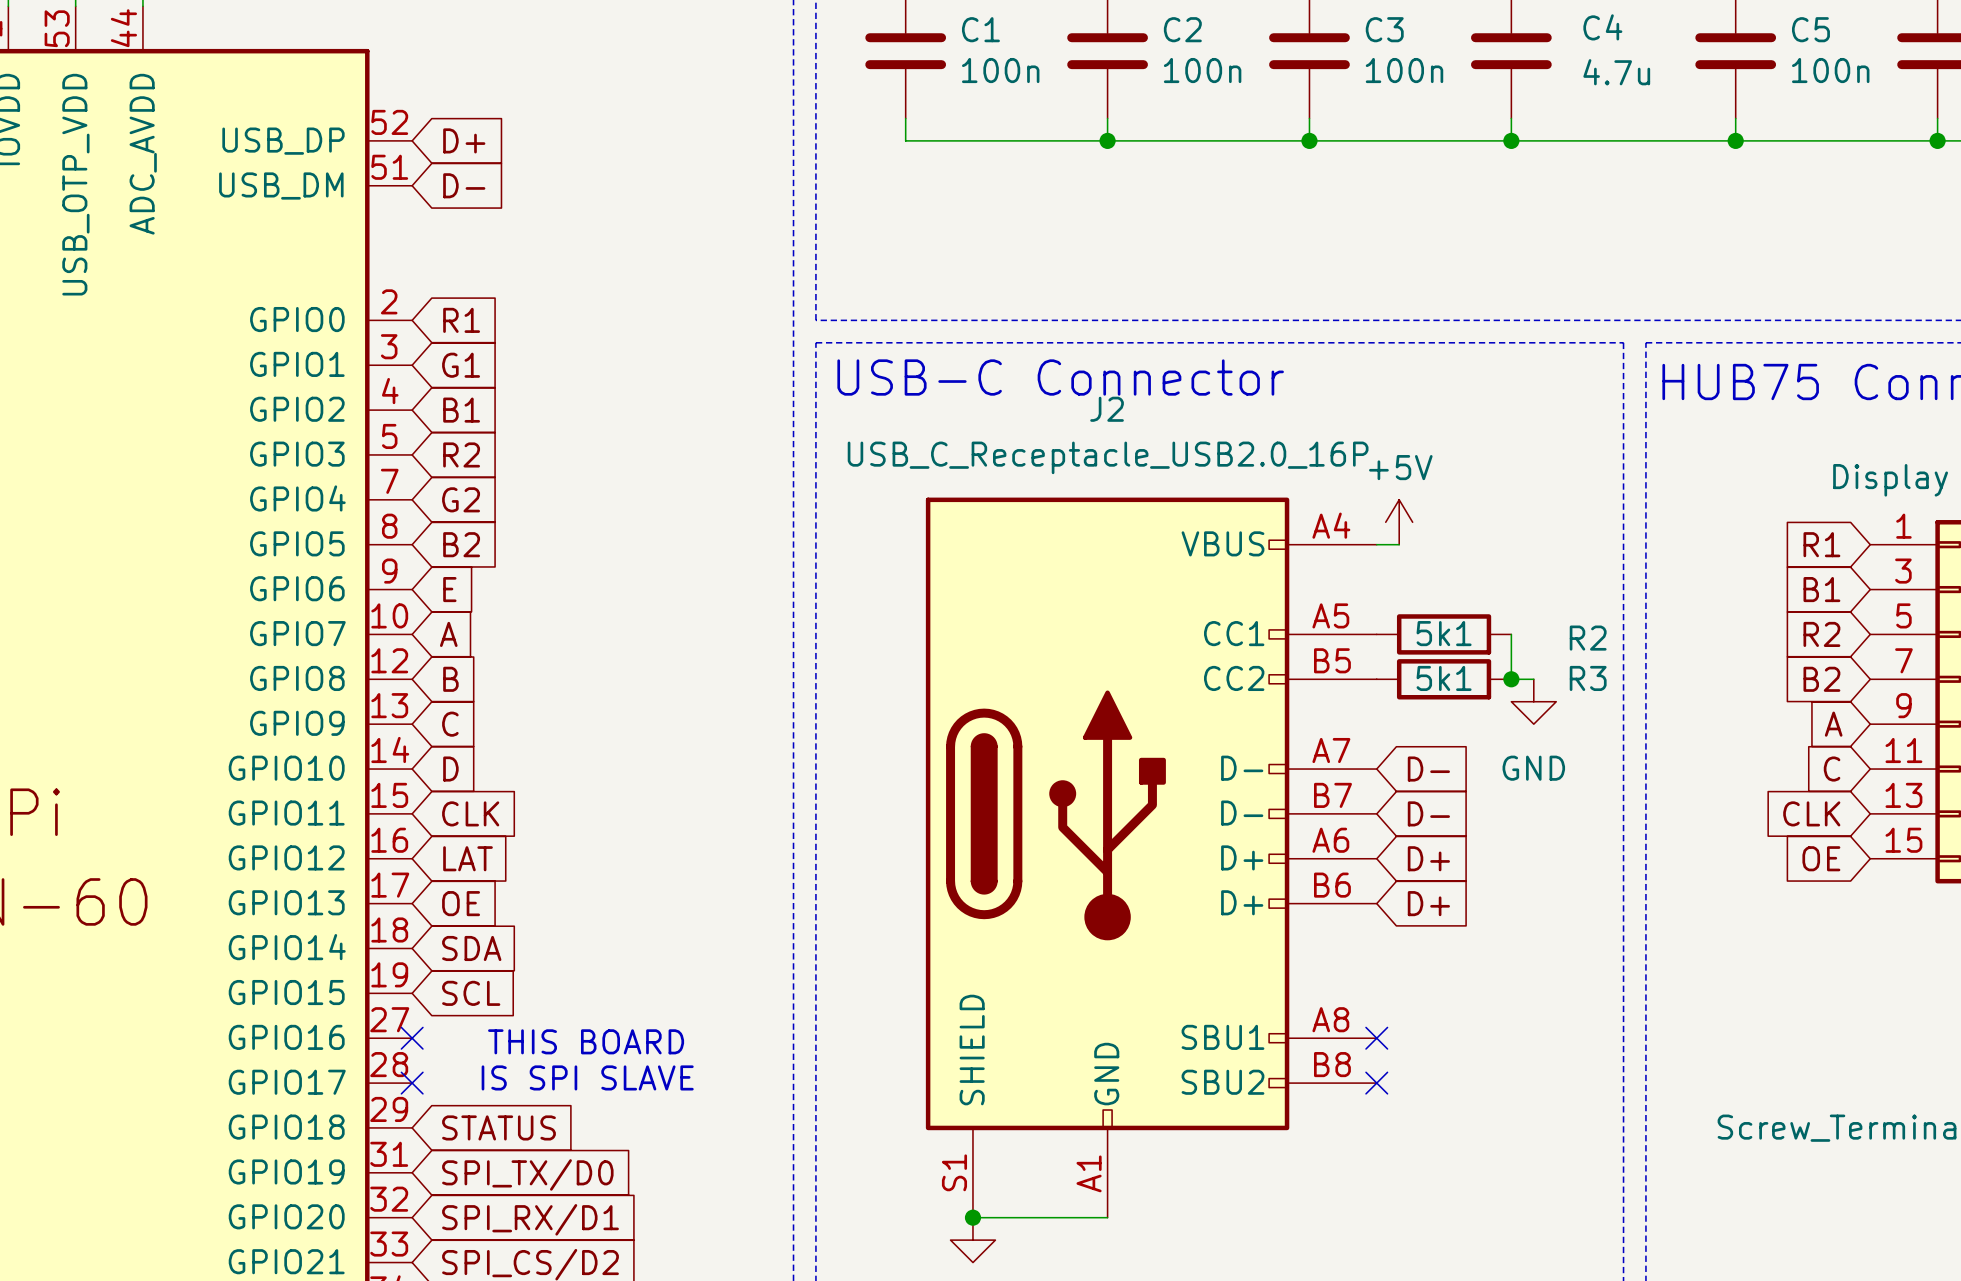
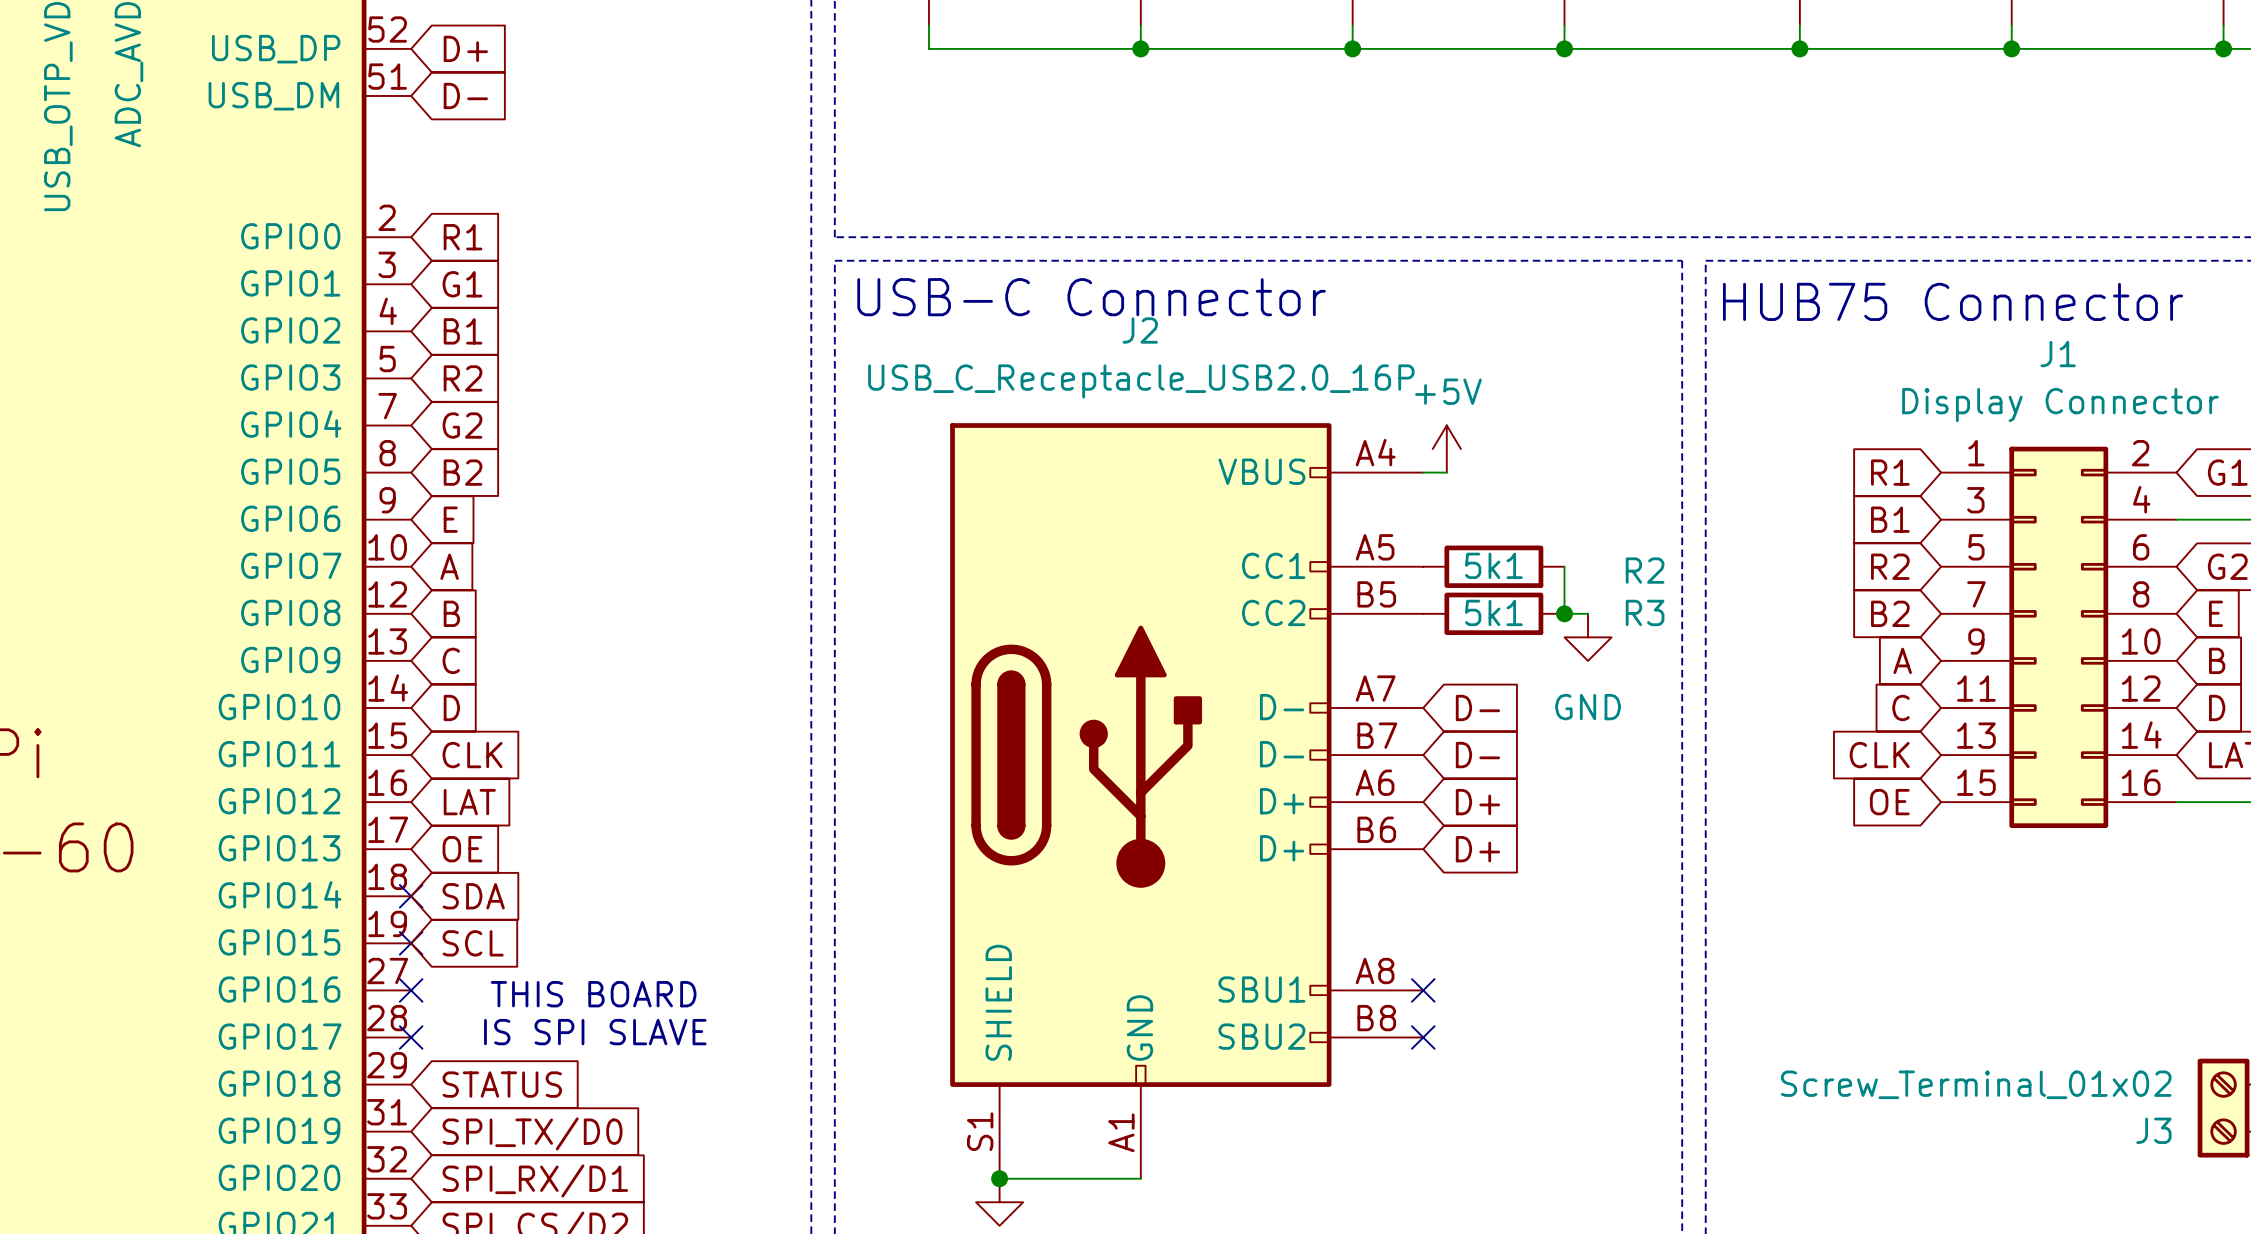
no-connect mark: none -> (411, 896)
no-connect mark: none -> (411, 943)

